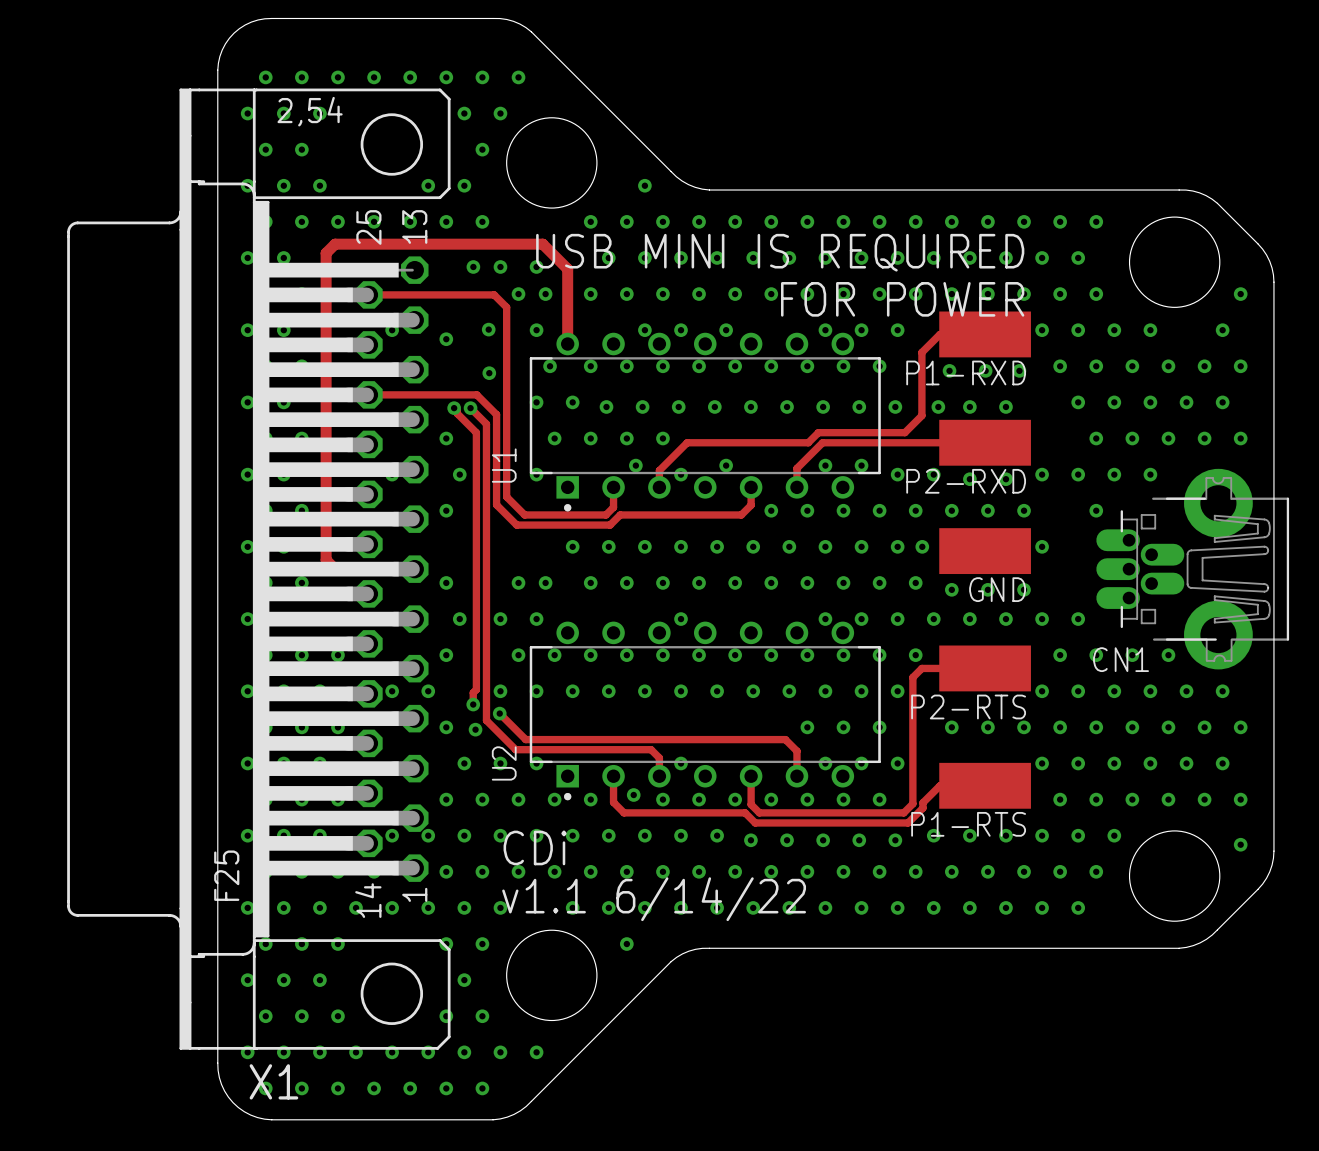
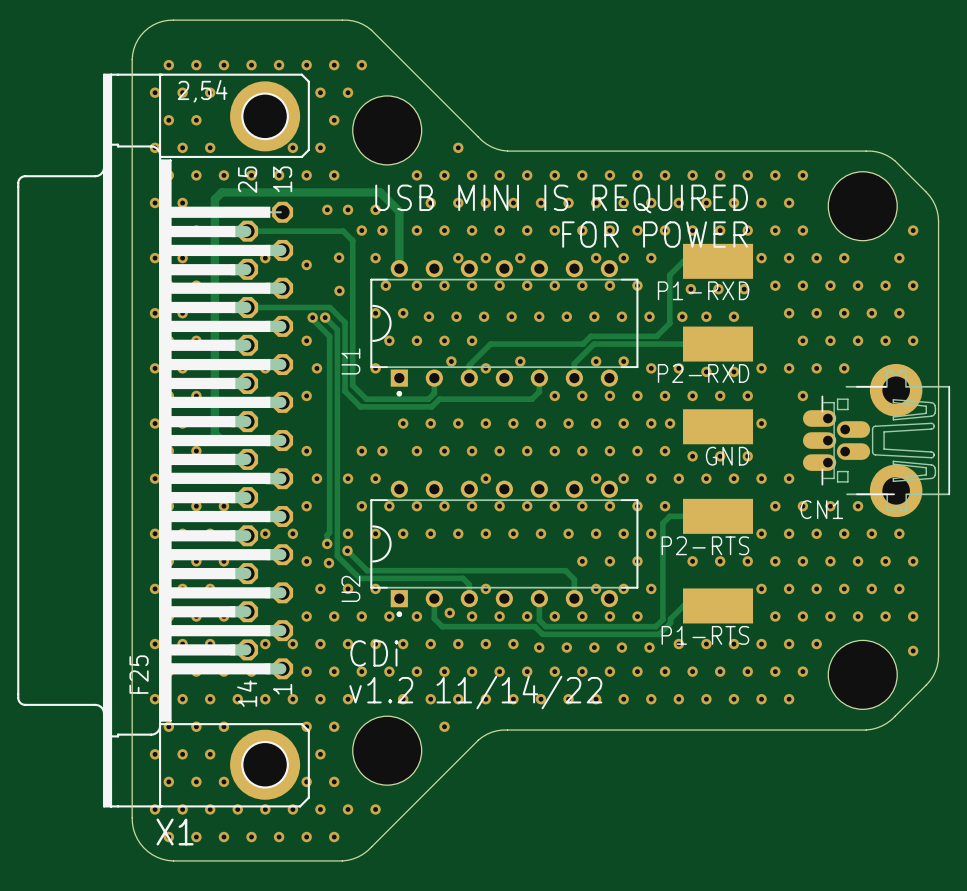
X1 footprint: [67, 88, 451, 1050] -> [17, 73, 310, 808]
U1 footprint: [529, 332, 881, 512] -> [370, 260, 639, 397]
U2 footprint: [529, 621, 881, 801] -> [370, 480, 639, 617]
text: v1.1 6/14/22 (654, 899) -> v1.2 11/14/22 (475, 692)

